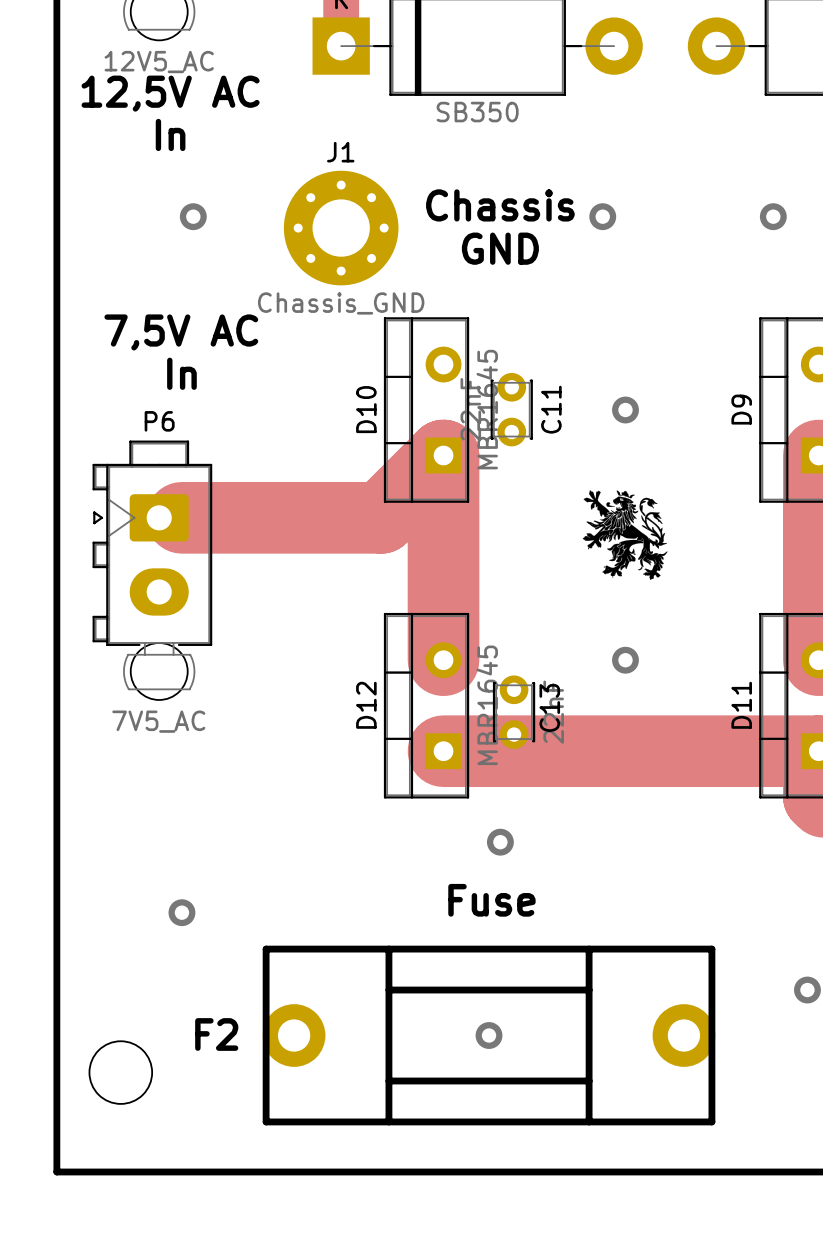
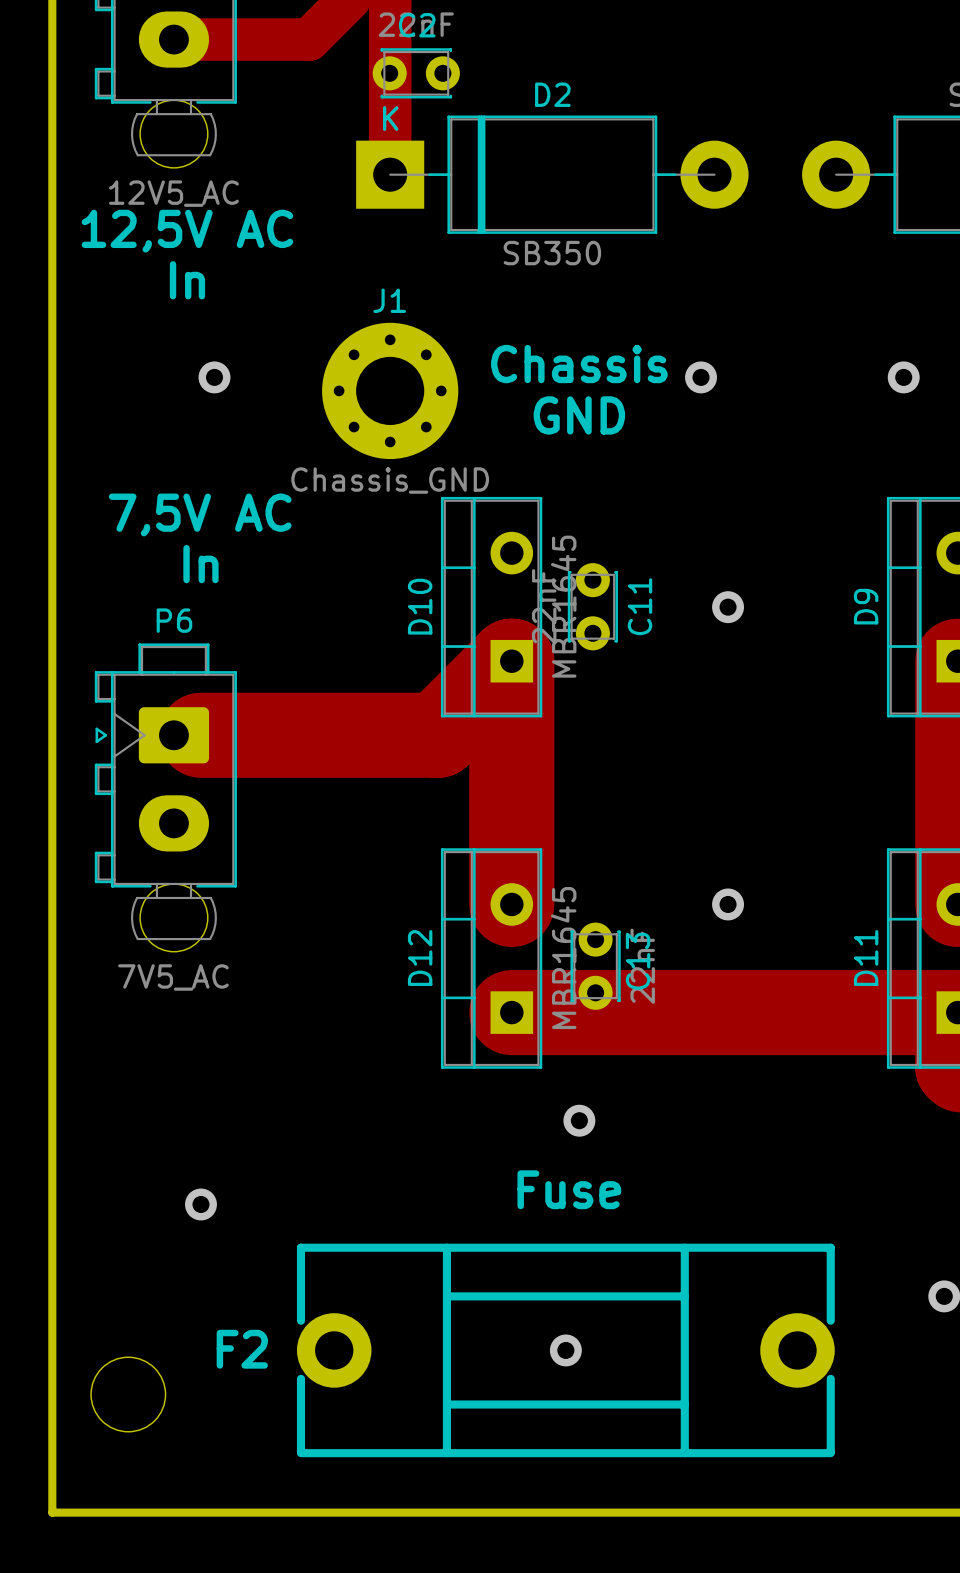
drawing: [582, 490, 668, 580] -> none
F2 footprint: [262, 945, 716, 1126] -> [296, 1243, 835, 1458]

